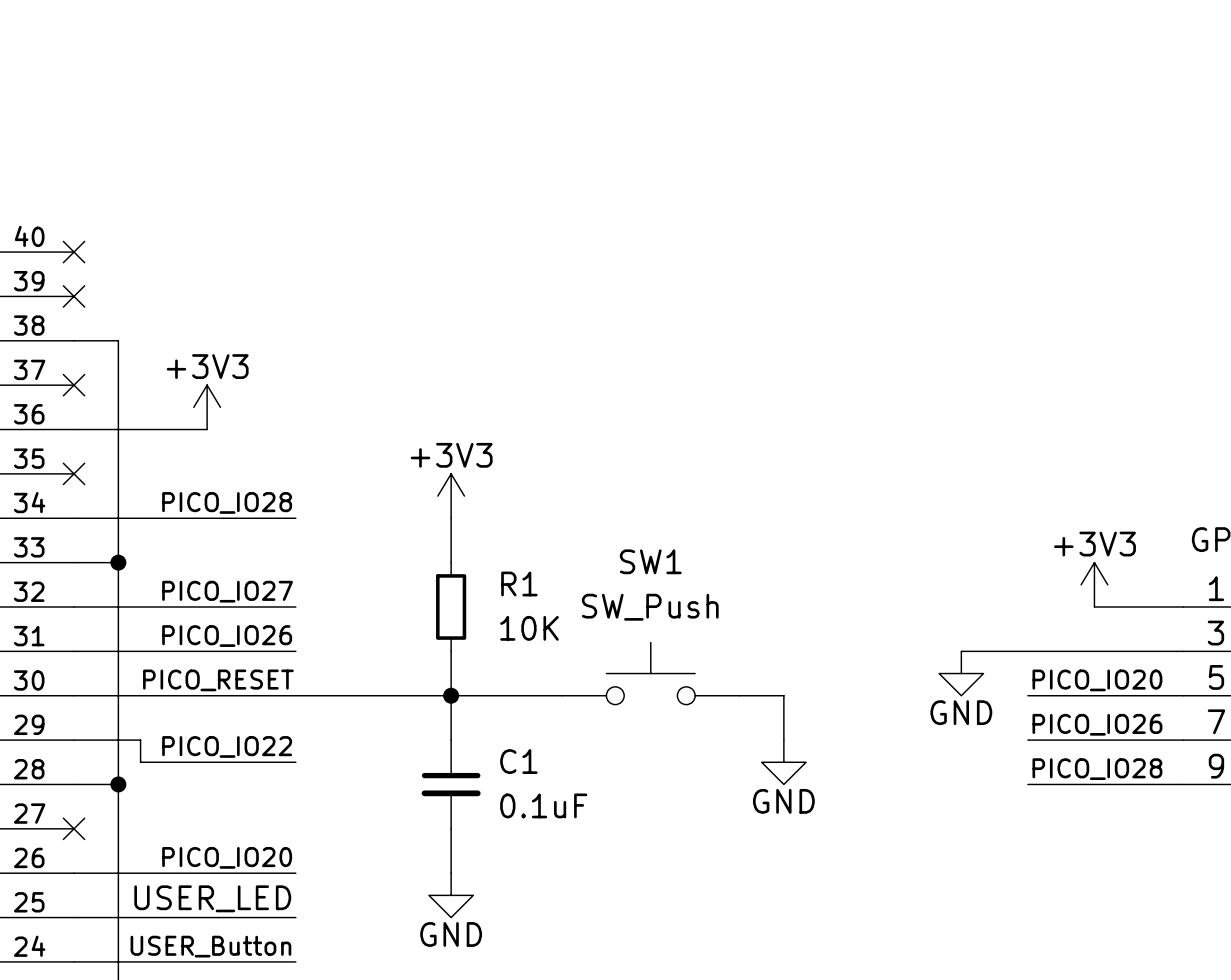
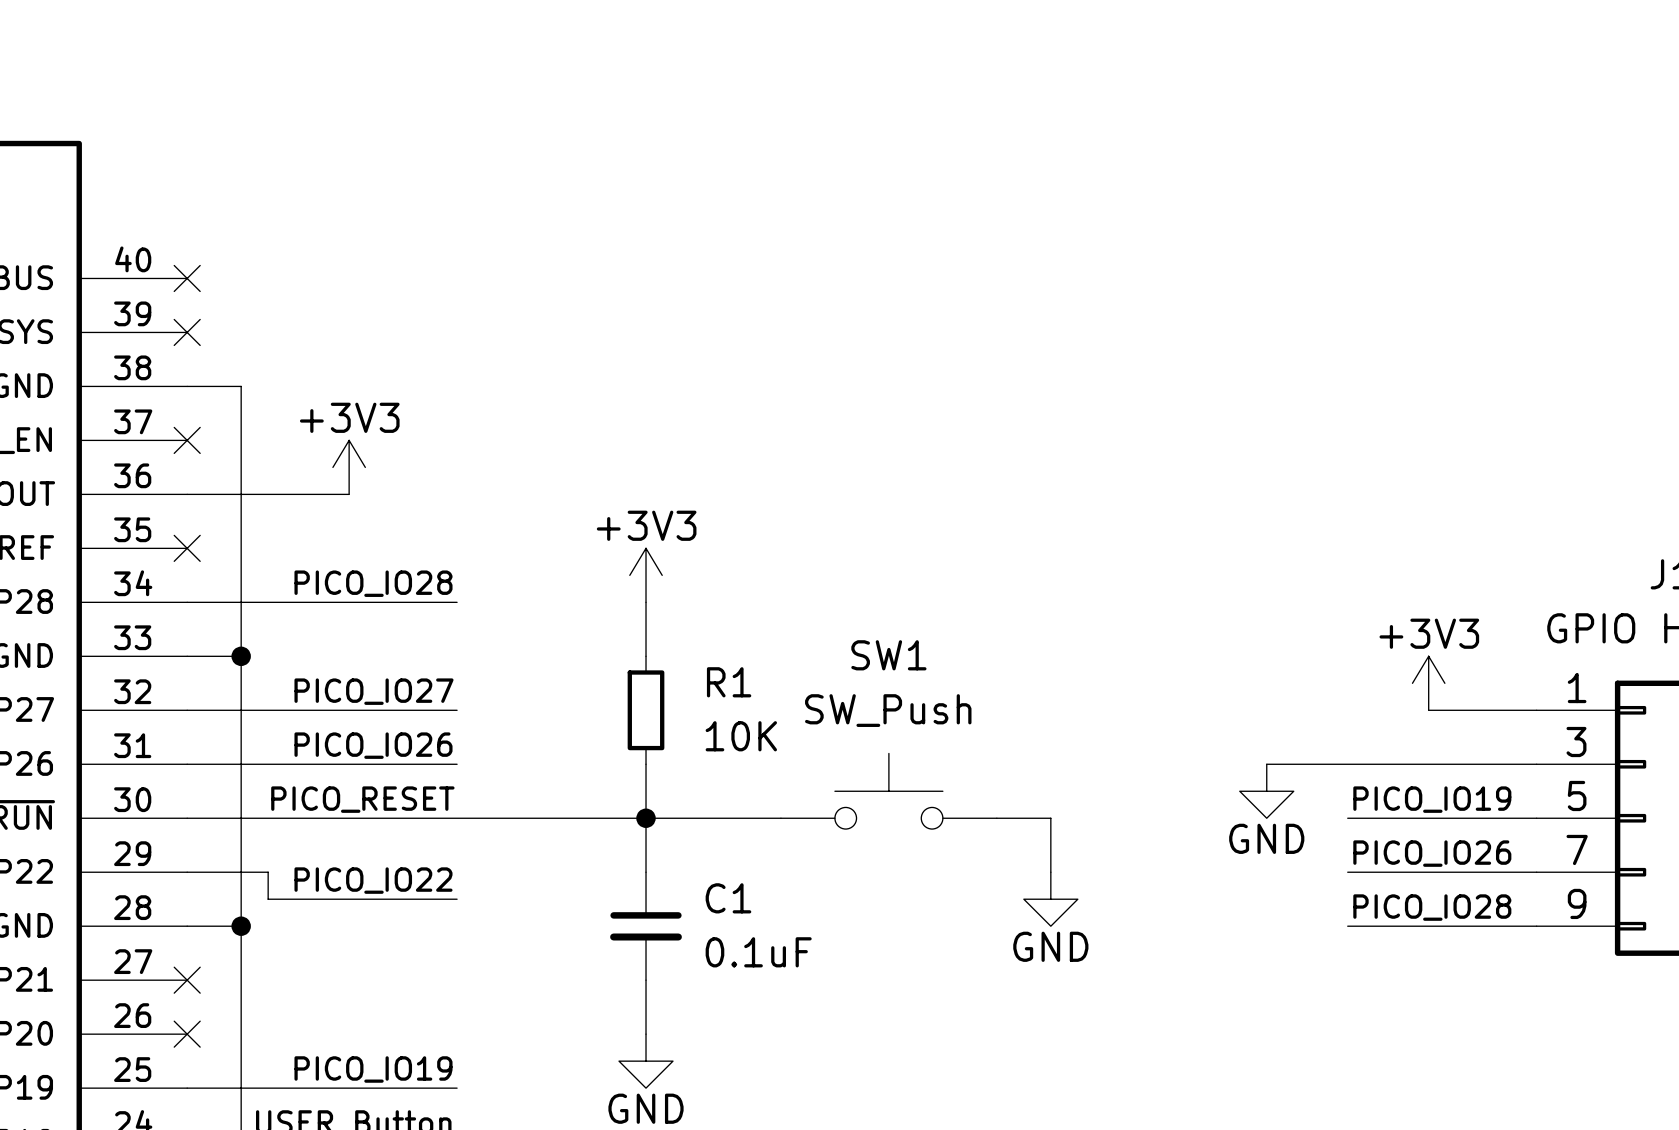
label: PICO_IO20 (1097, 680) -> PICO_IO19 (1432, 799)
label: PICO_IO20 (227, 857) -> none
wire: (74, 873) (295, 873) -> none
no-connect mark: none -> (187, 1034)
label: USER_LED (212, 898) -> PICO_IO19 (373, 1069)

